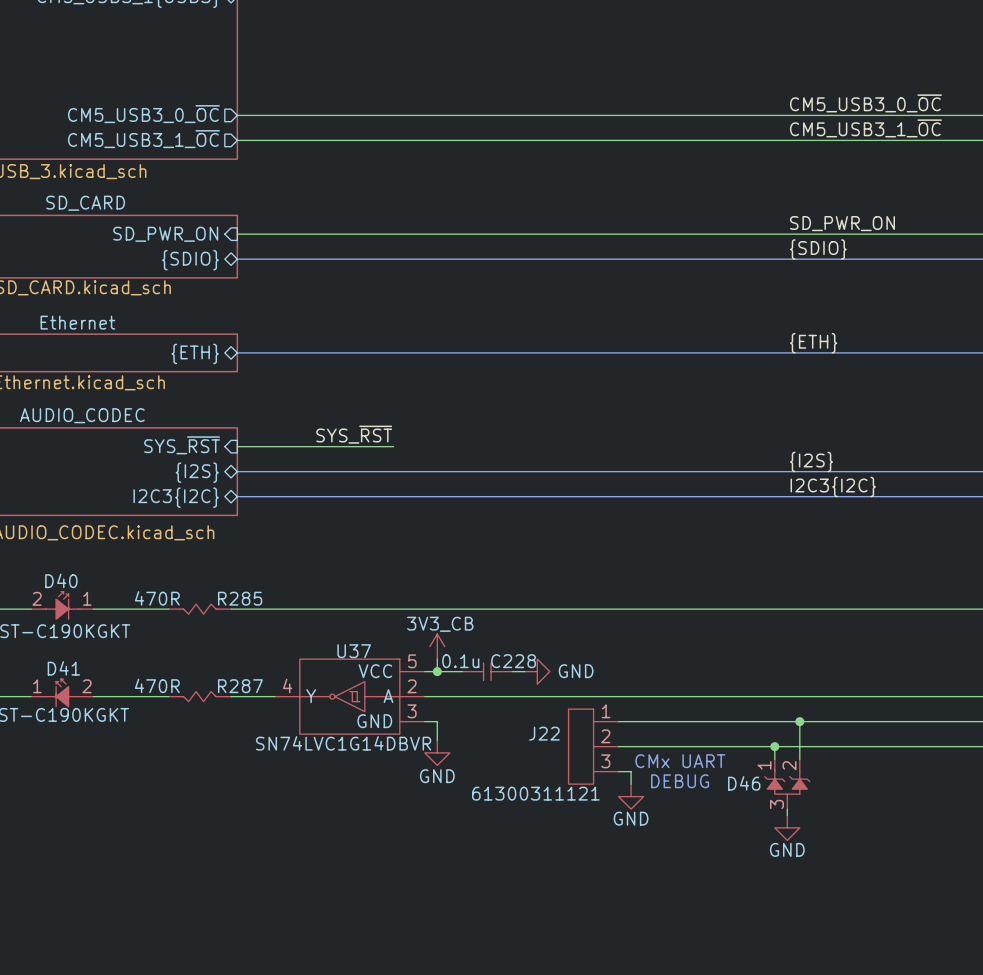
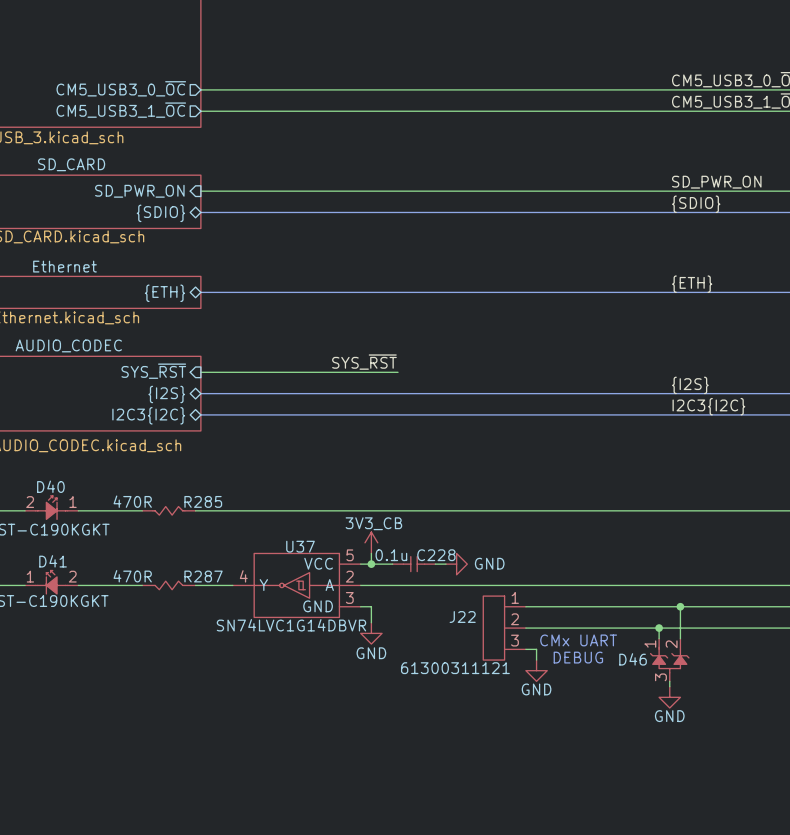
label position: SYS_~{RST} (354, 434) -> SYS_~{RST} (364, 362)
wire: none -> (334, 372) (398, 372)

